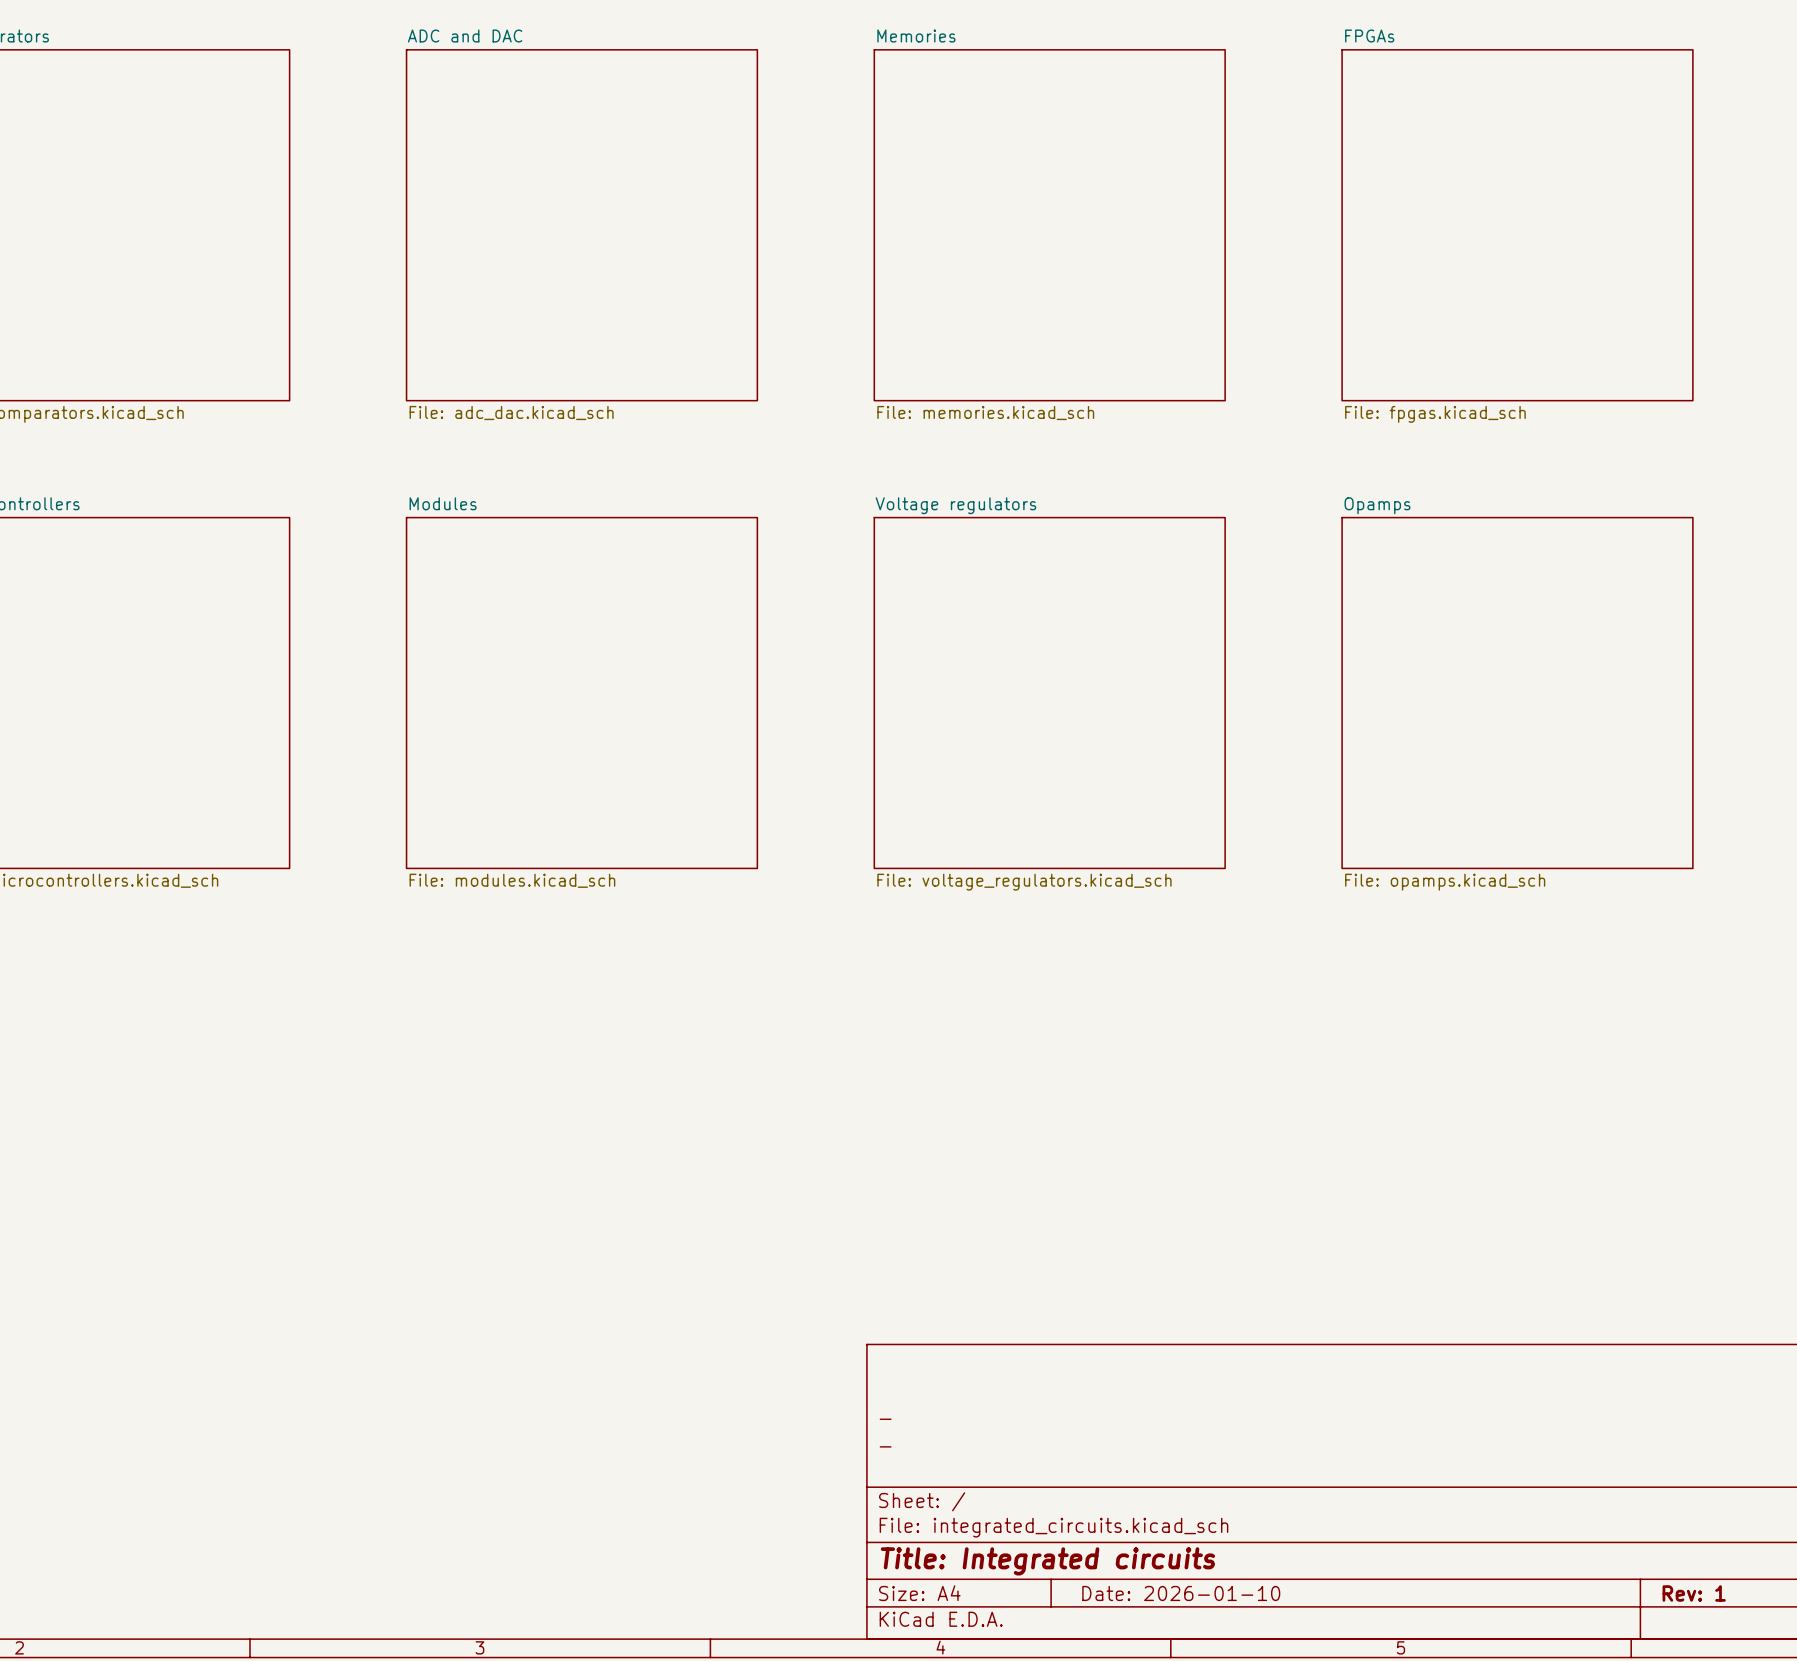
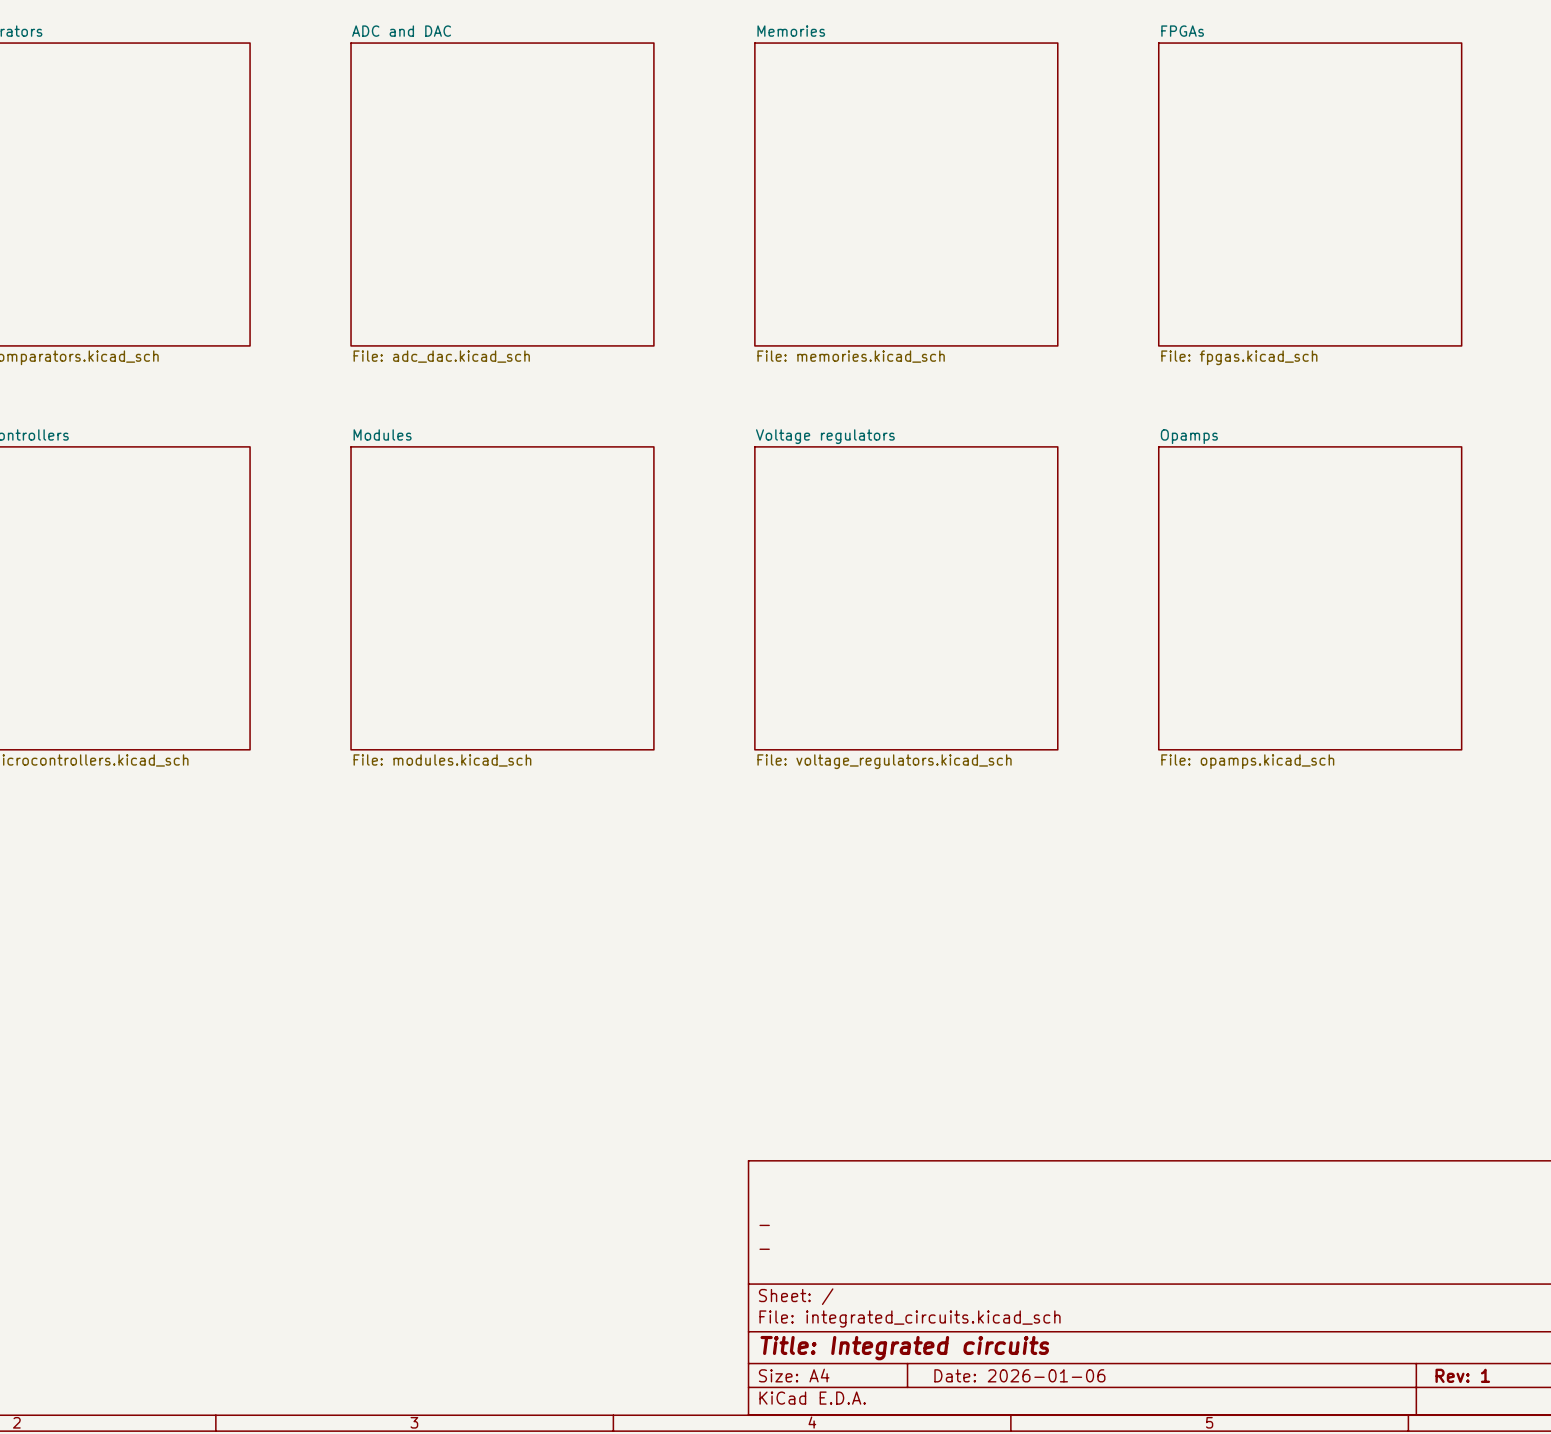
title block: Date: 2026-01-10 (1181, 1593) -> Date: 2026-01-06 (1019, 1375)

